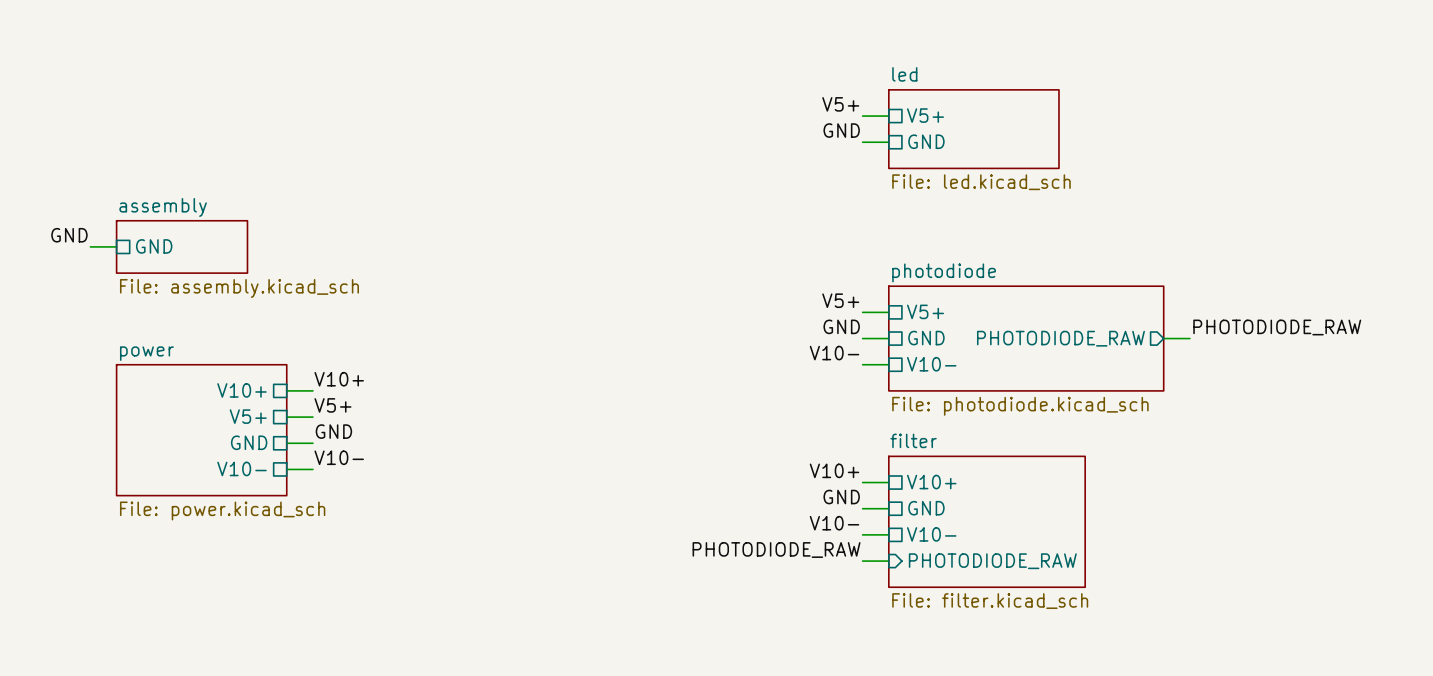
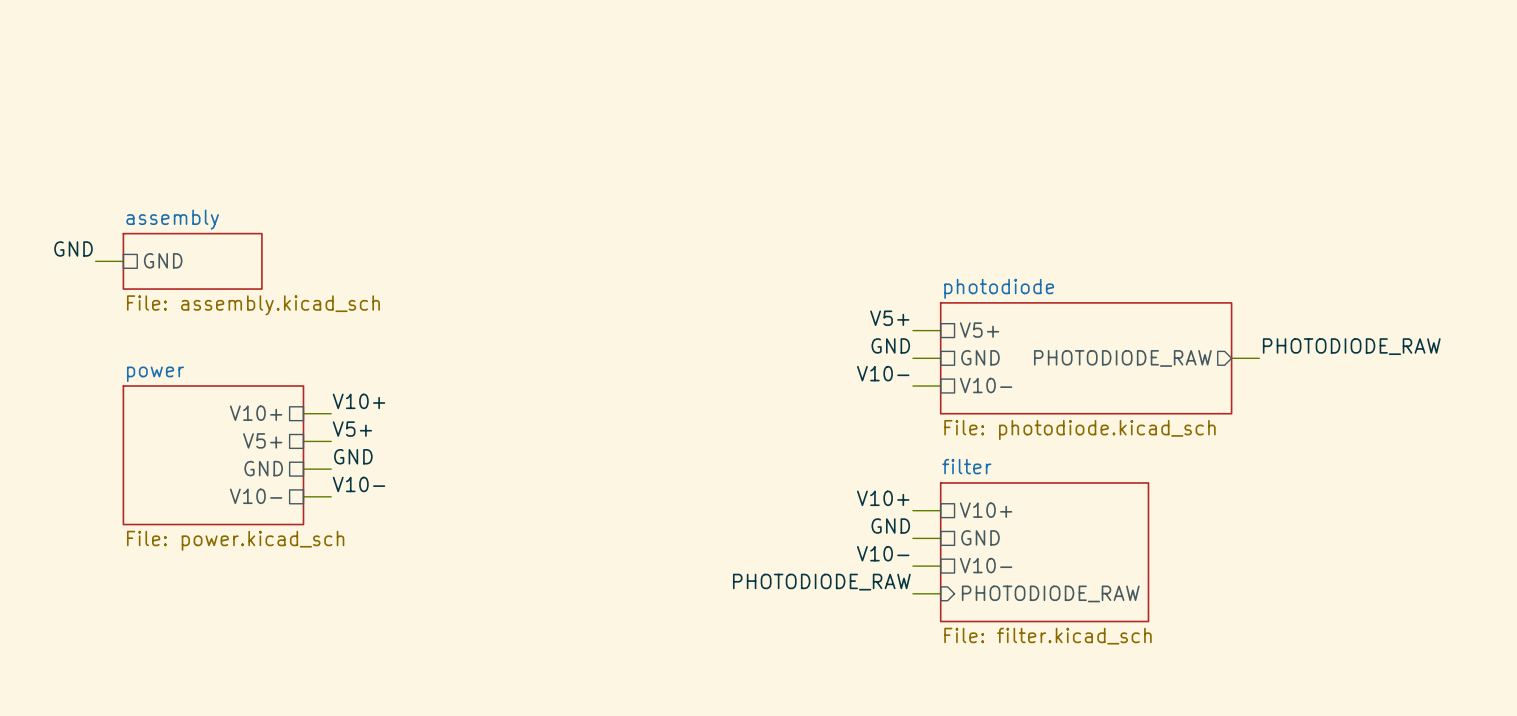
label: V5+ (840, 104) -> none
sheet pin: V5+ (925, 115) -> none
wire: (862, 116) (888, 116) -> none
sheet led: File: led.kicad_sch (973, 129) -> none
label: GND (841, 130) -> none
sheet pin: GND (926, 141) -> none
wire: (862, 142) (888, 142) -> none

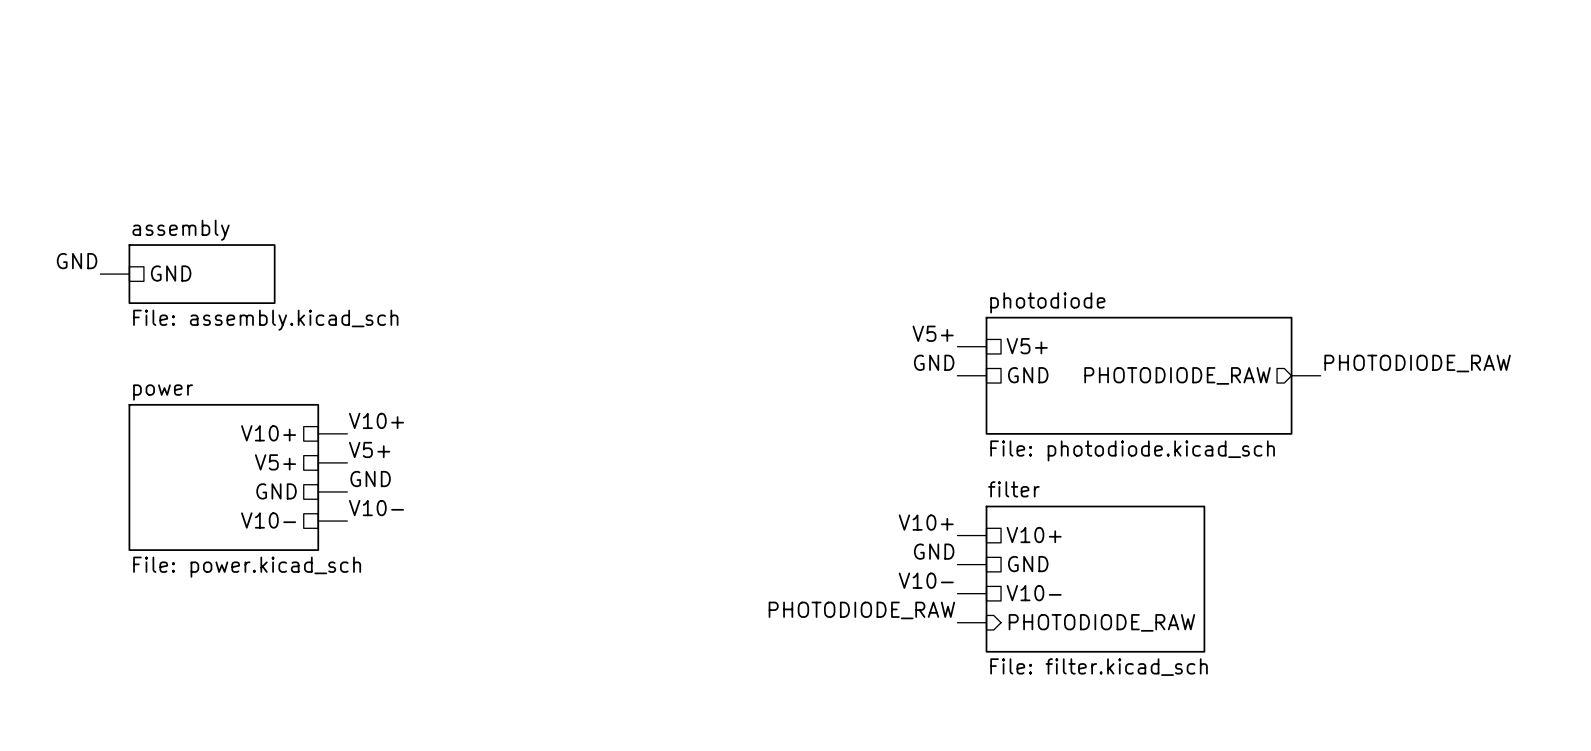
label: V10- (883, 373) -> none
sheet pin: V10- (986, 385) -> none
wire: (912, 386) (940, 386) -> none

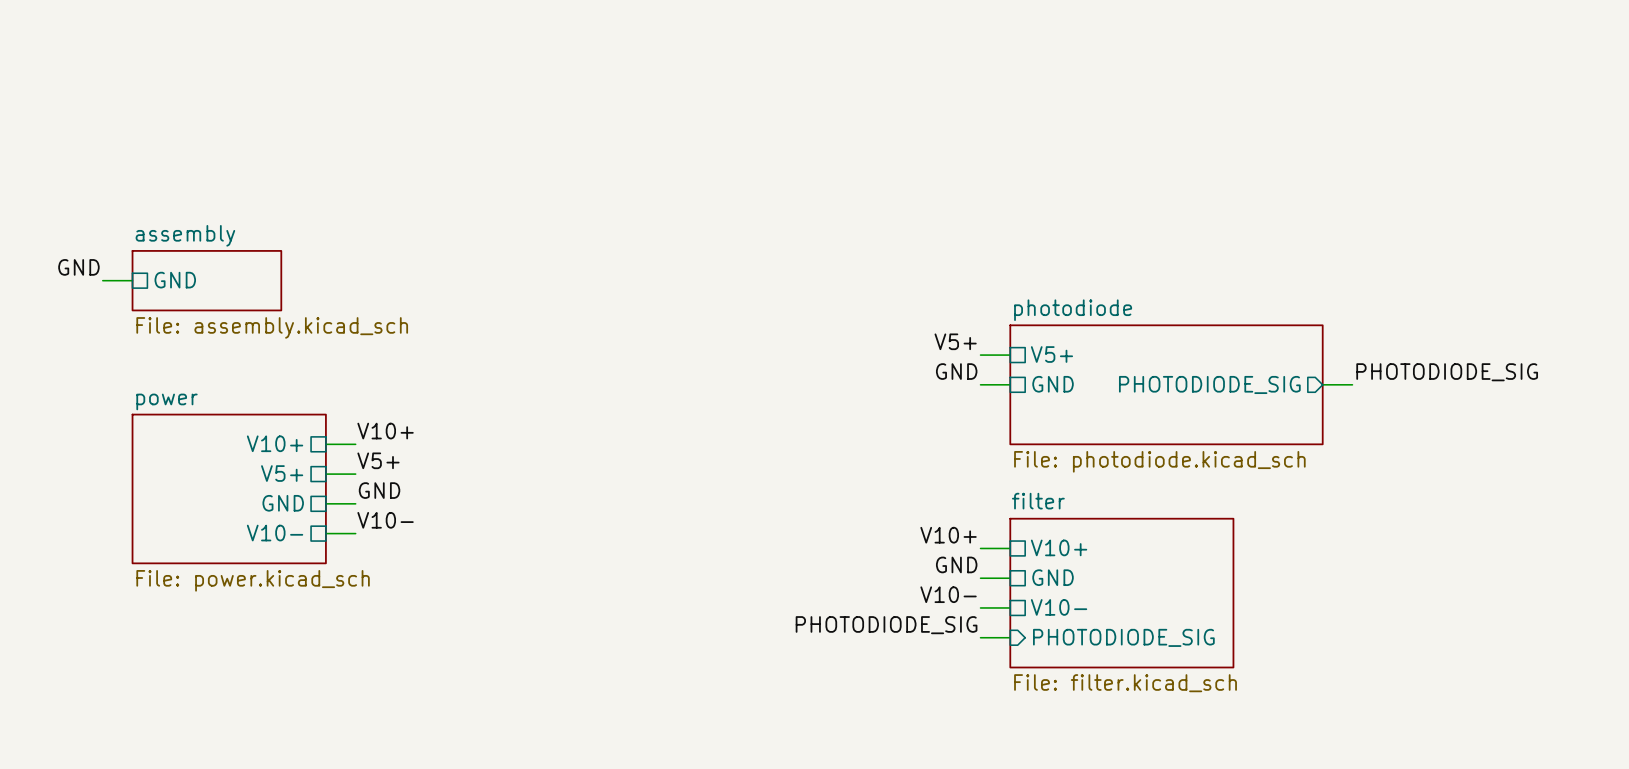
label: PHOTODIODE_RAW (1417, 363) -> PHOTODIODE_SIG (1447, 372)
sheet pin: PHOTODIODE_RAW (1177, 375) -> PHOTODIODE_SIG (1209, 384)
label: PHOTODIODE_RAW (861, 610) -> PHOTODIODE_SIG (886, 625)
sheet pin: PHOTODIODE_RAW (1101, 622) -> PHOTODIODE_SIG (1123, 637)

